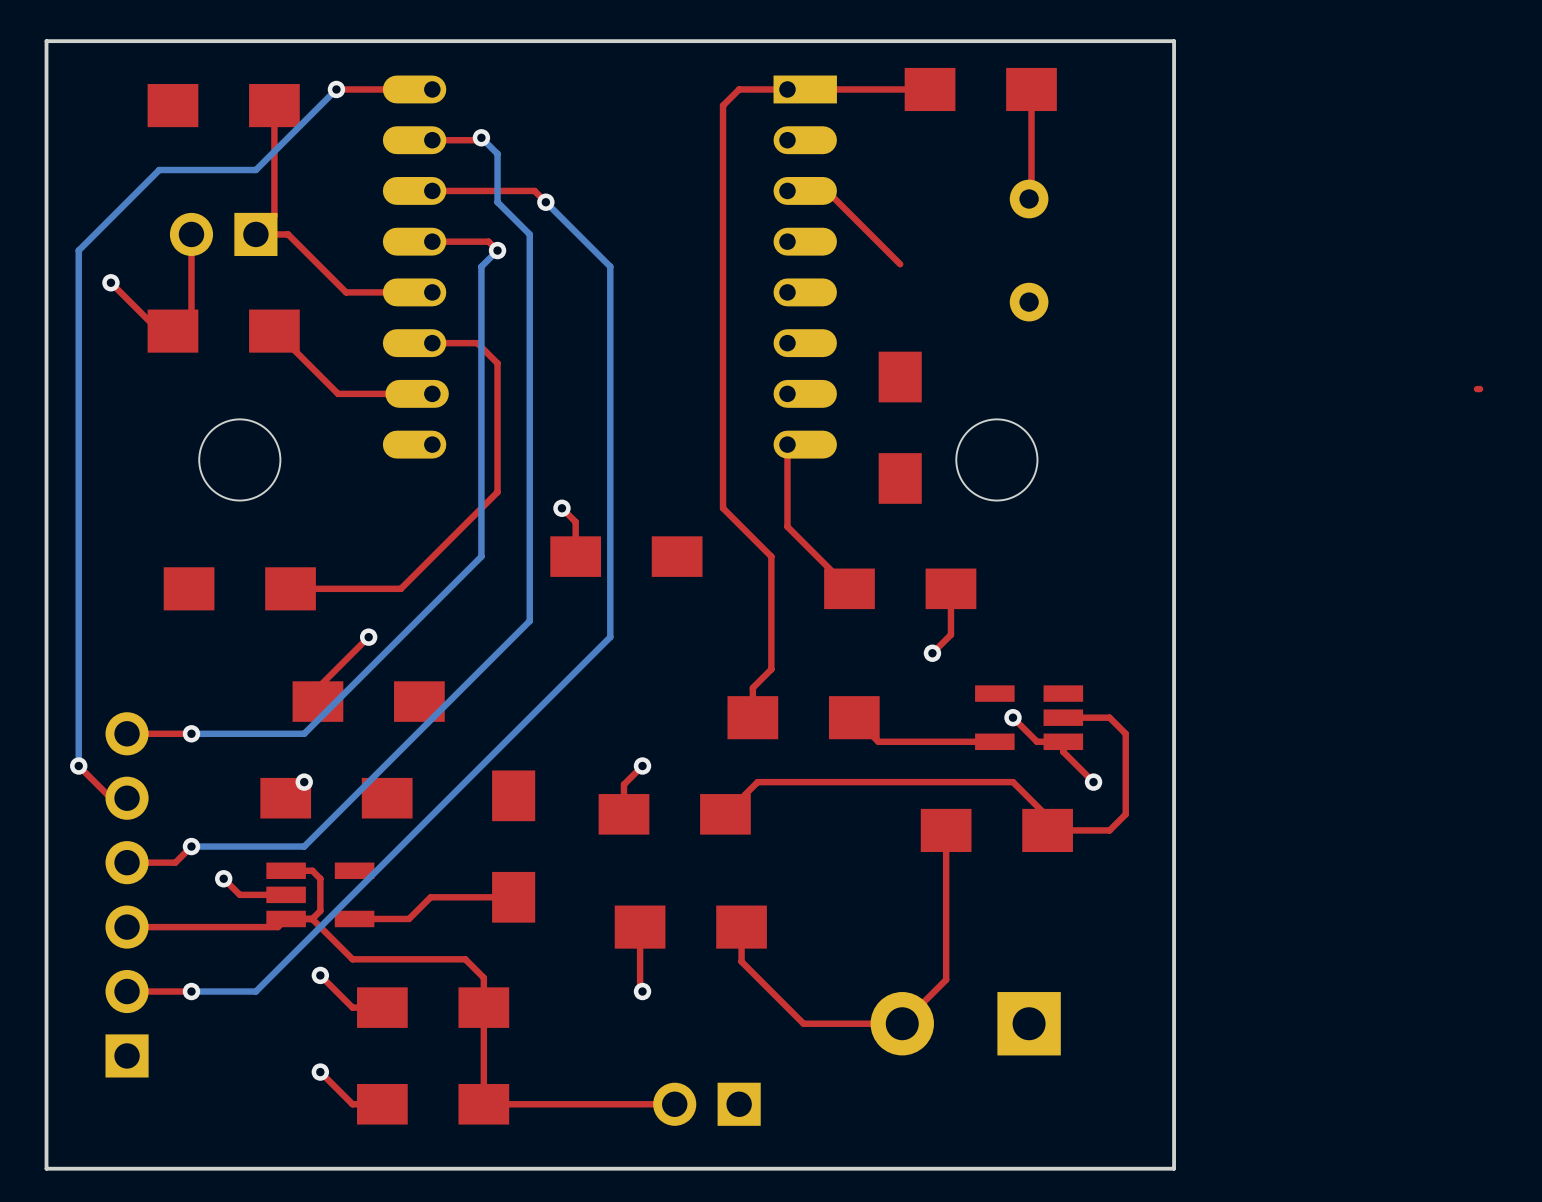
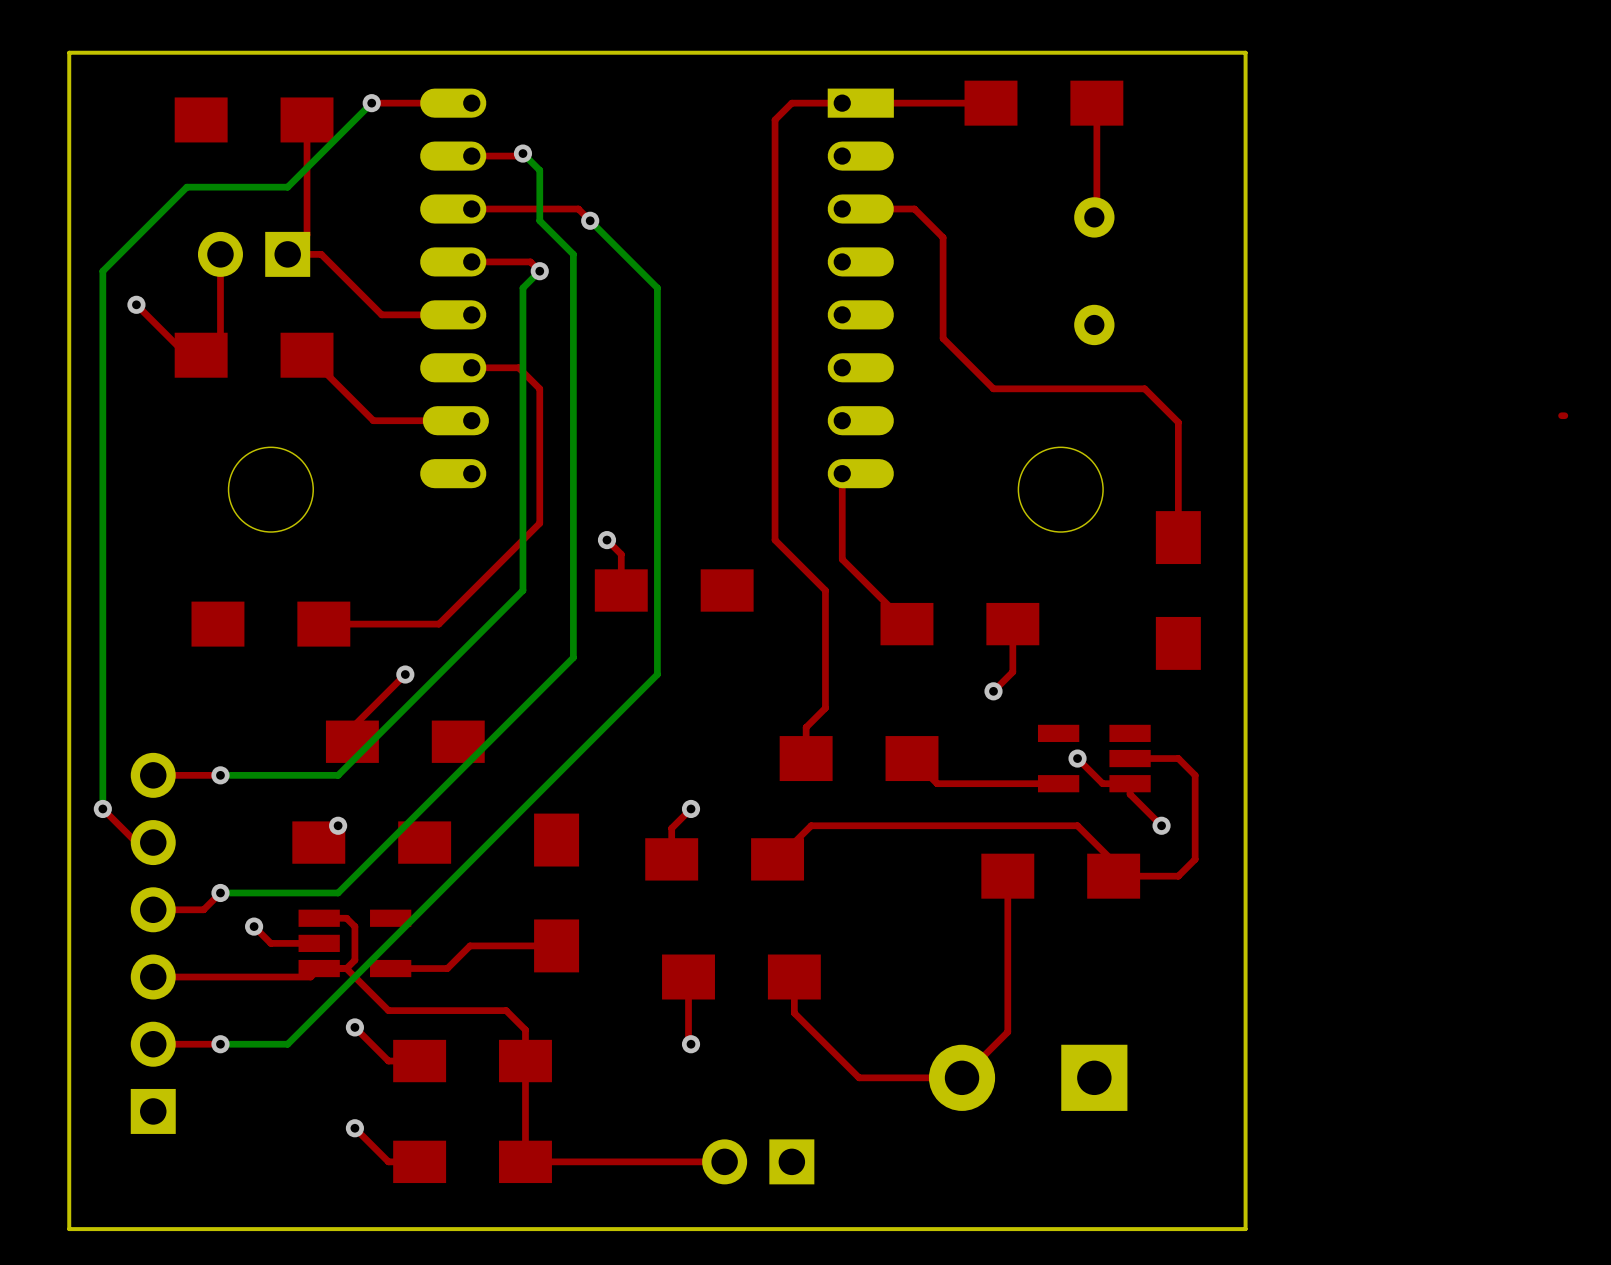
top track: (826, 190) (900, 264) -> (883, 209) (914, 209) (943, 237) (943, 338) (993, 388) (1144, 388) (1178, 422) (1178, 537)
part position: (900, 427) -> (1178, 590)

